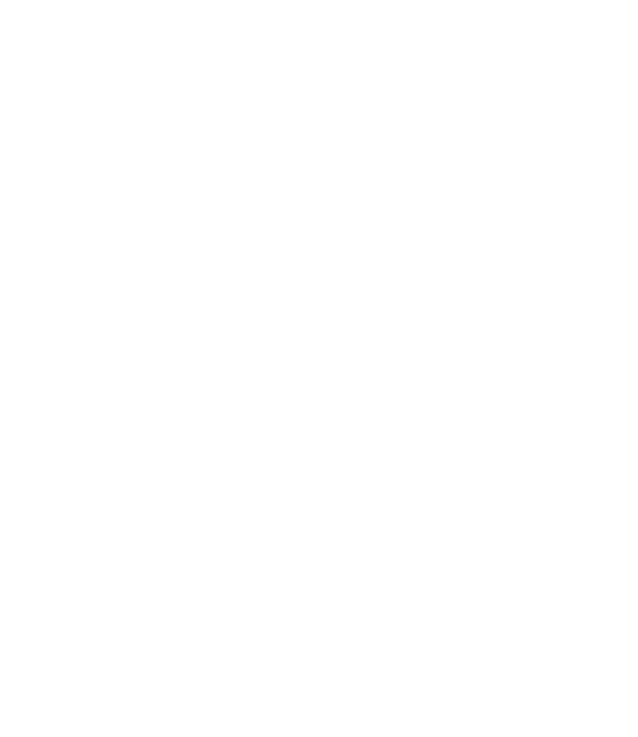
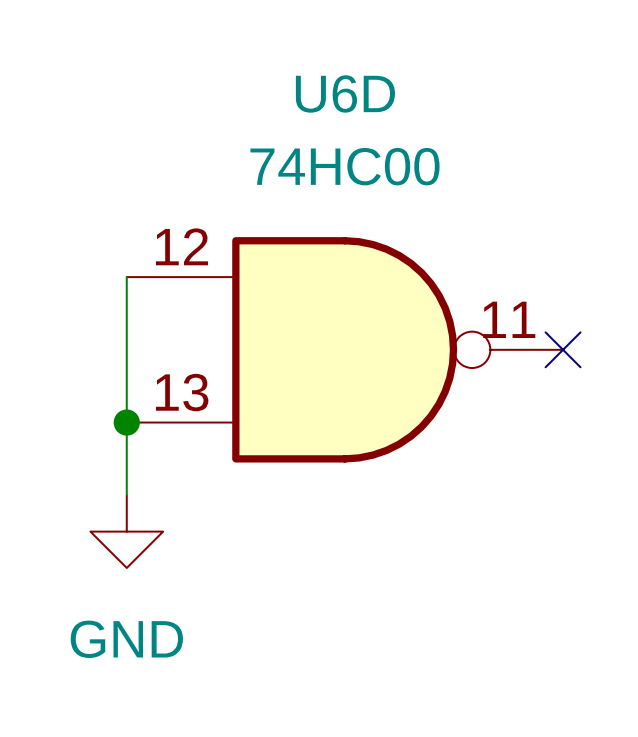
wire: none -> (126, 277) (126, 495)
U6D: none -> 74HC00 (344, 349)
no-connect mark: none -> (563, 349)
junction: none -> (126, 422)
power symbol: none -> GND (126, 531)

